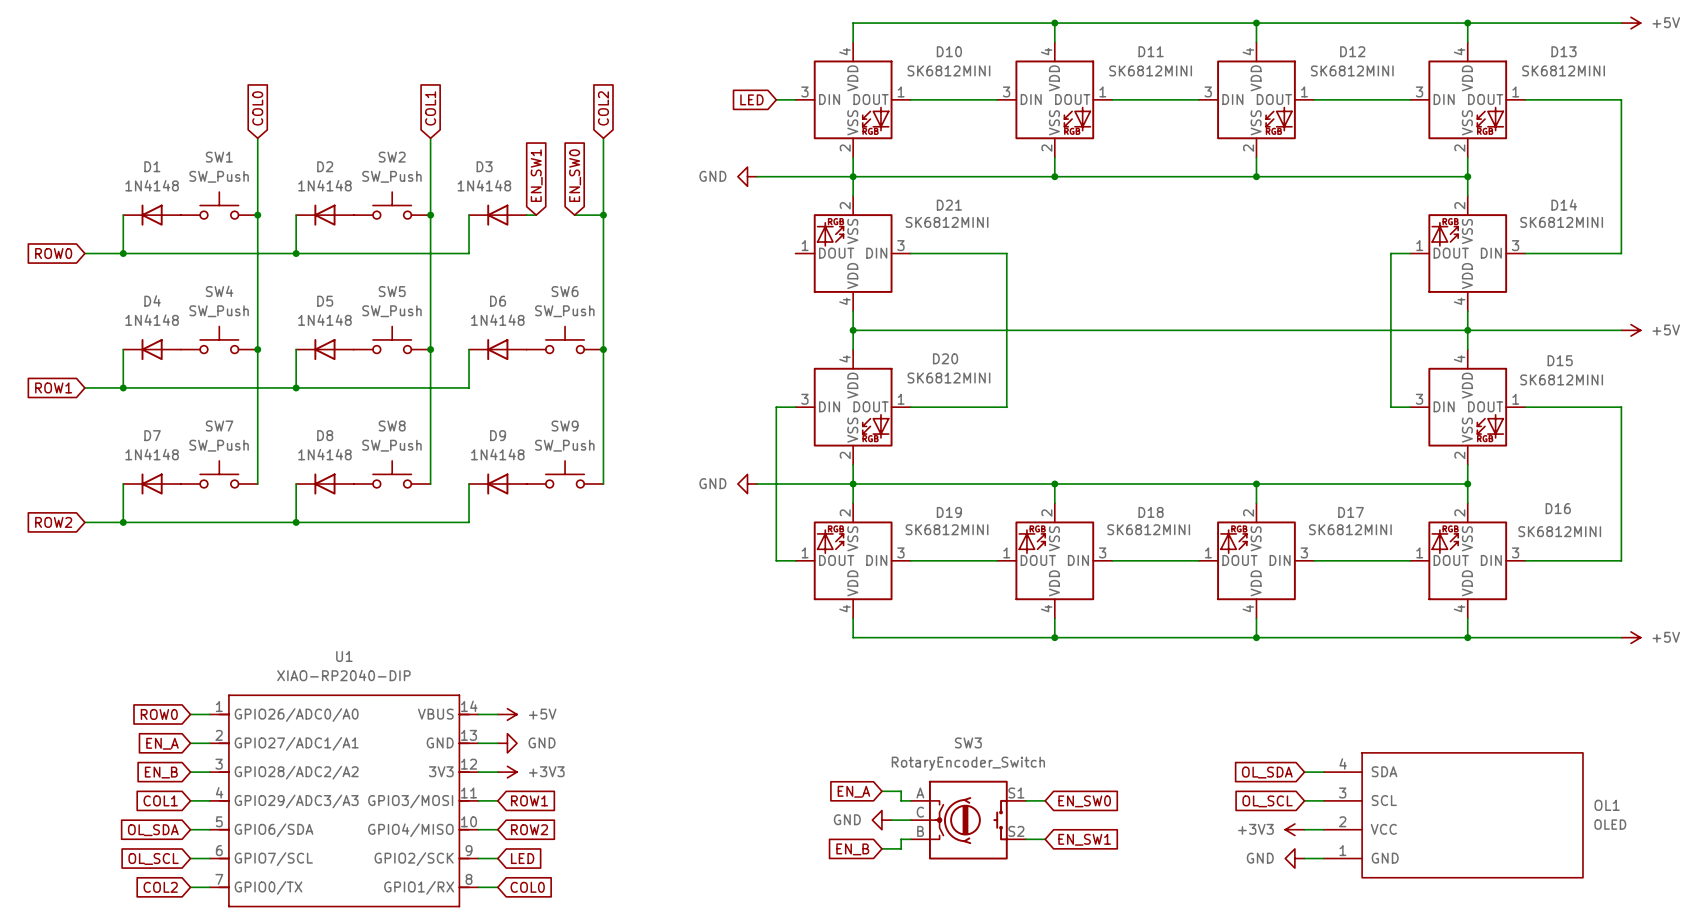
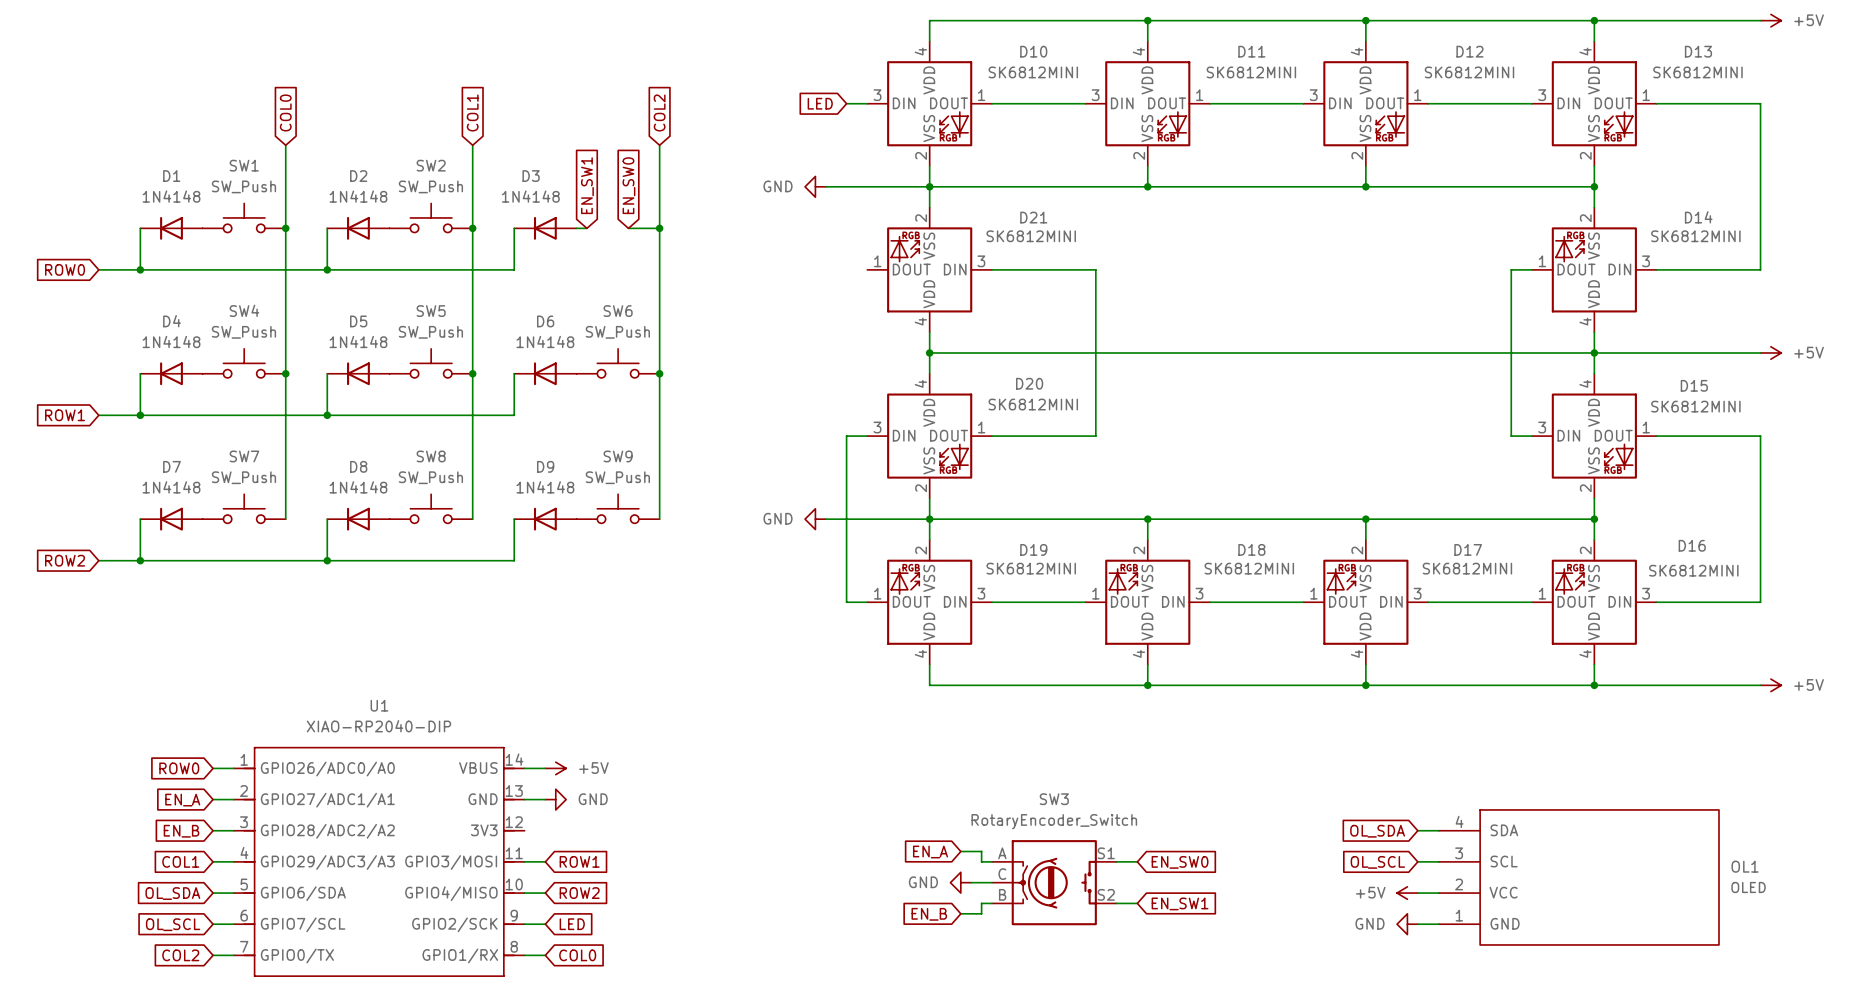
wire: (478, 772) (497, 772) -> none
power symbol: +3V3 (507, 772) -> none
power symbol: +3V3 (1294, 829) -> +5V (1407, 893)

